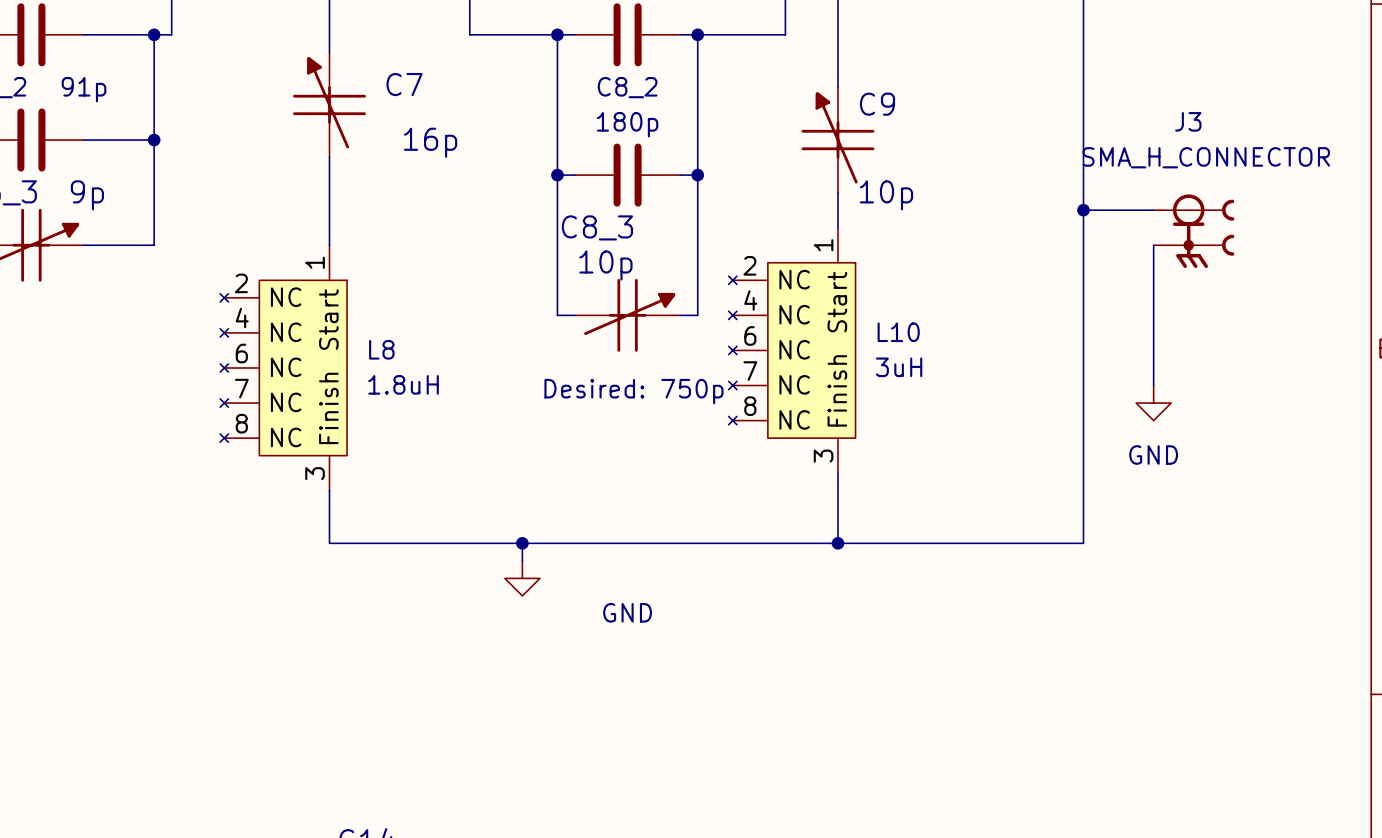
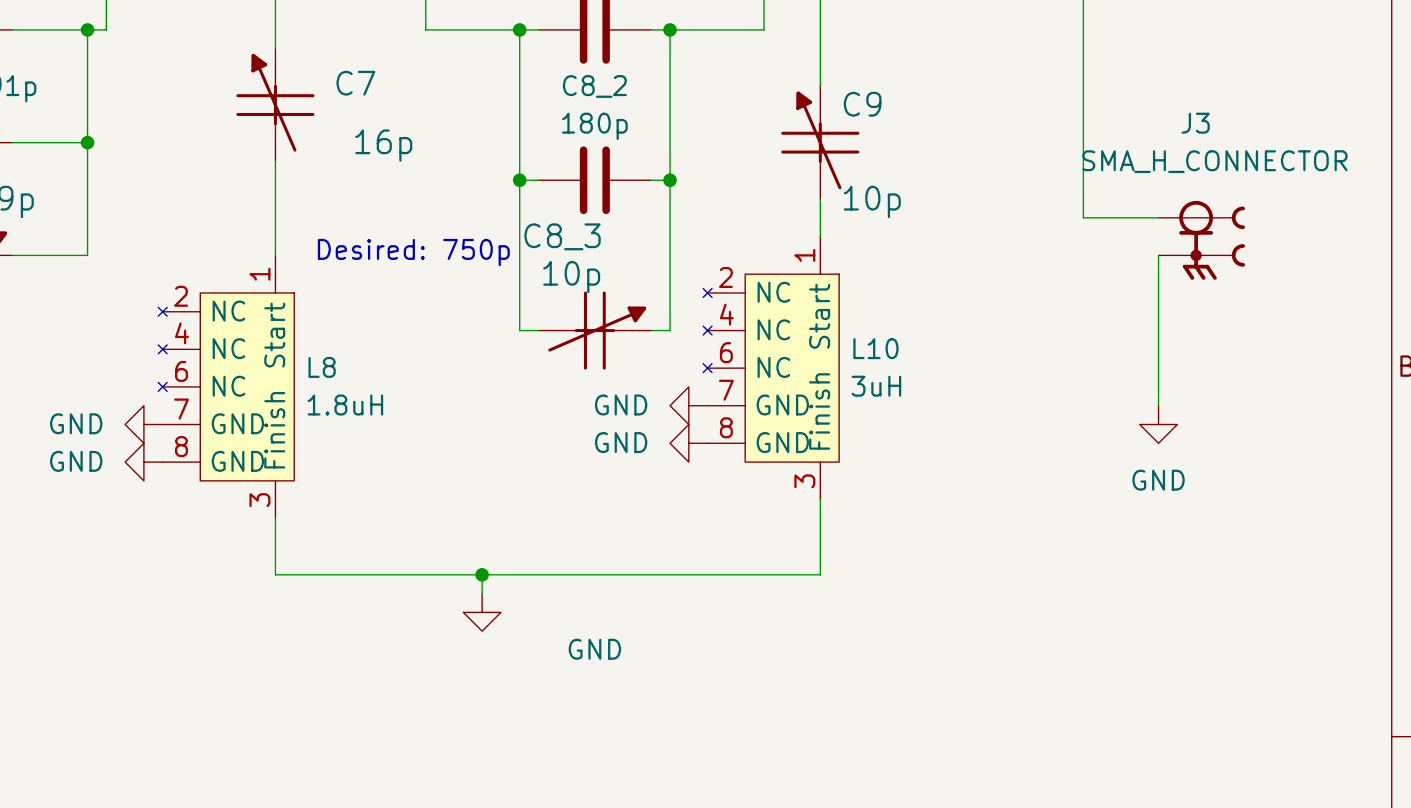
wire: (1083, 210) (1083, 543) (838, 543) -> none
junction: (1083, 210) -> none
L10 symbol: [728, 227, 856, 474] -> [703, 236, 840, 500]
L8 symbol: [220, 245, 348, 491] -> [158, 255, 295, 519]
power symbol: none -> GND (688, 405)
text position: Desired: 750p (633, 391) -> Desired: 750p (413, 252)
power symbol: none -> GND (143, 424)
power symbol: none -> GND (688, 443)
power symbol: none -> GND (143, 462)
junction: (838, 543) -> none

